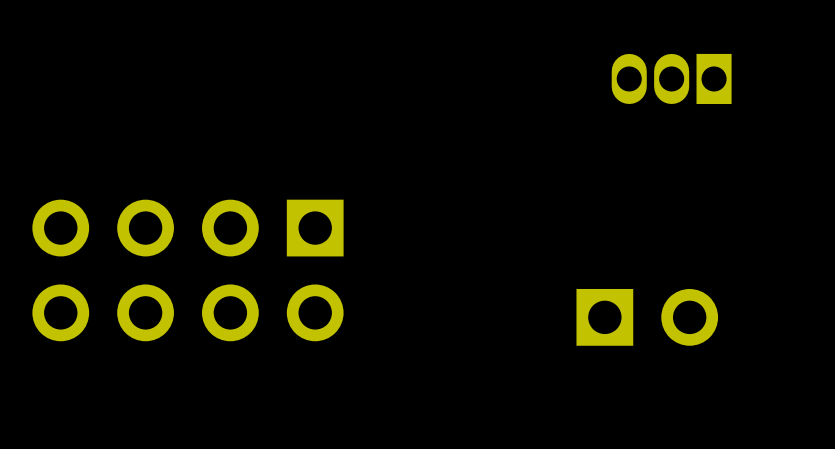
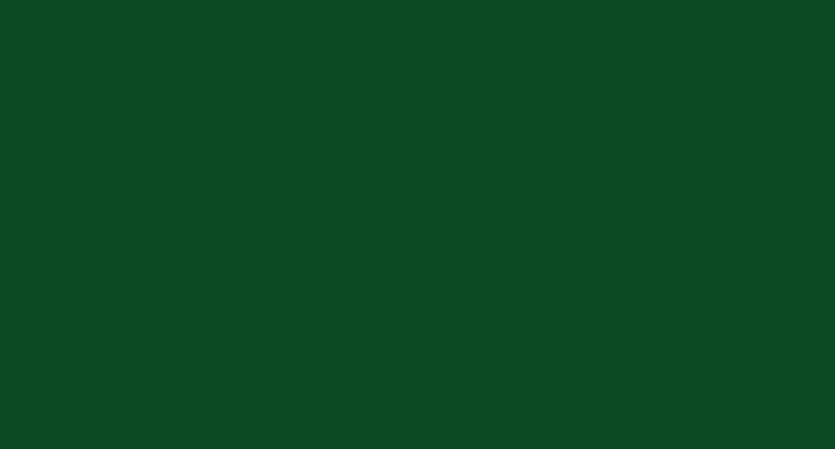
part: (671, 78) -> none
part: (187, 270) -> none
part: (647, 317) -> none

